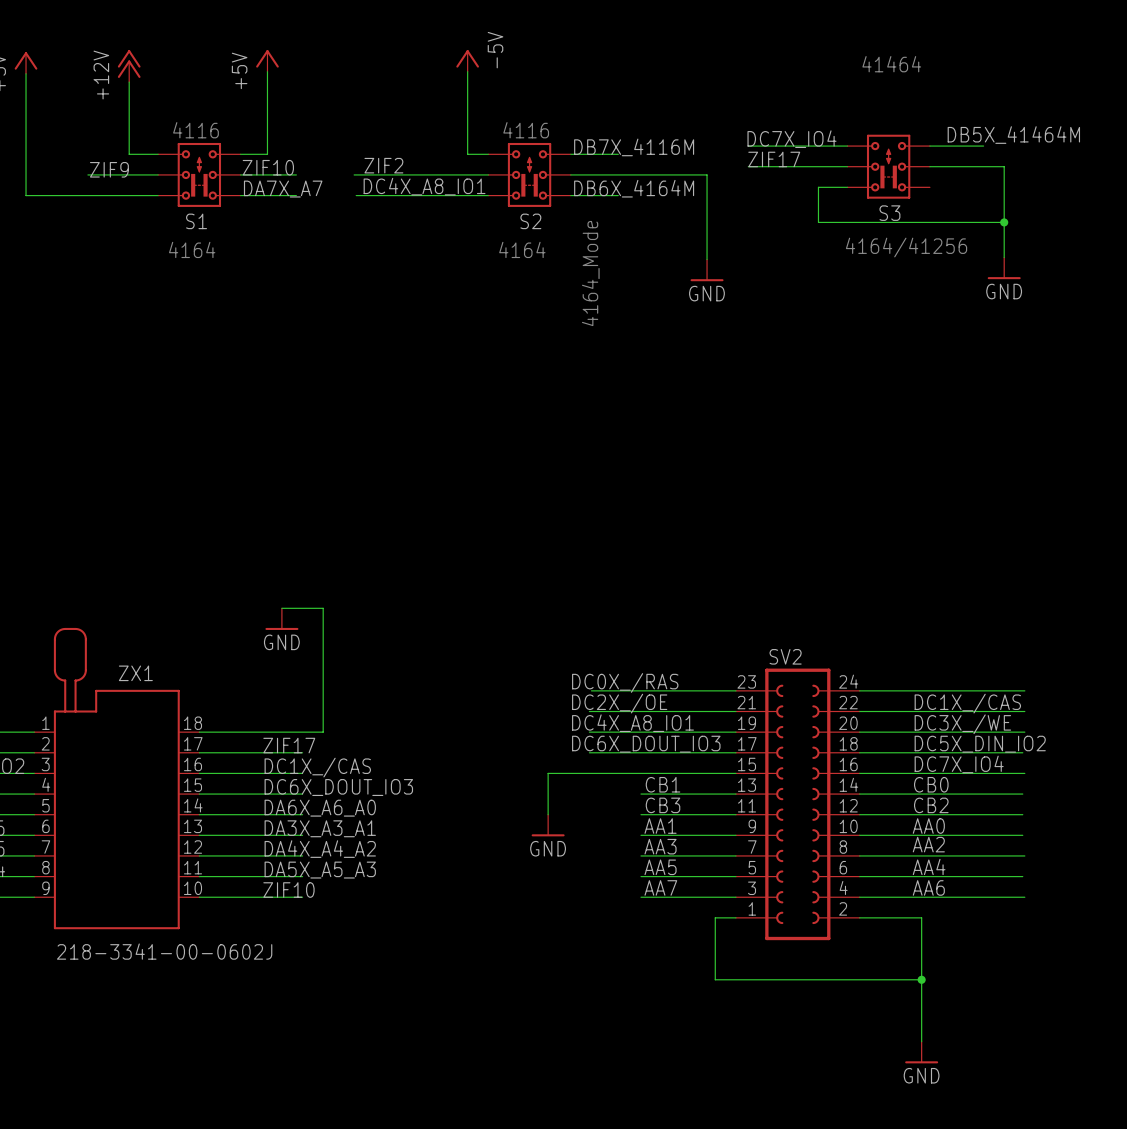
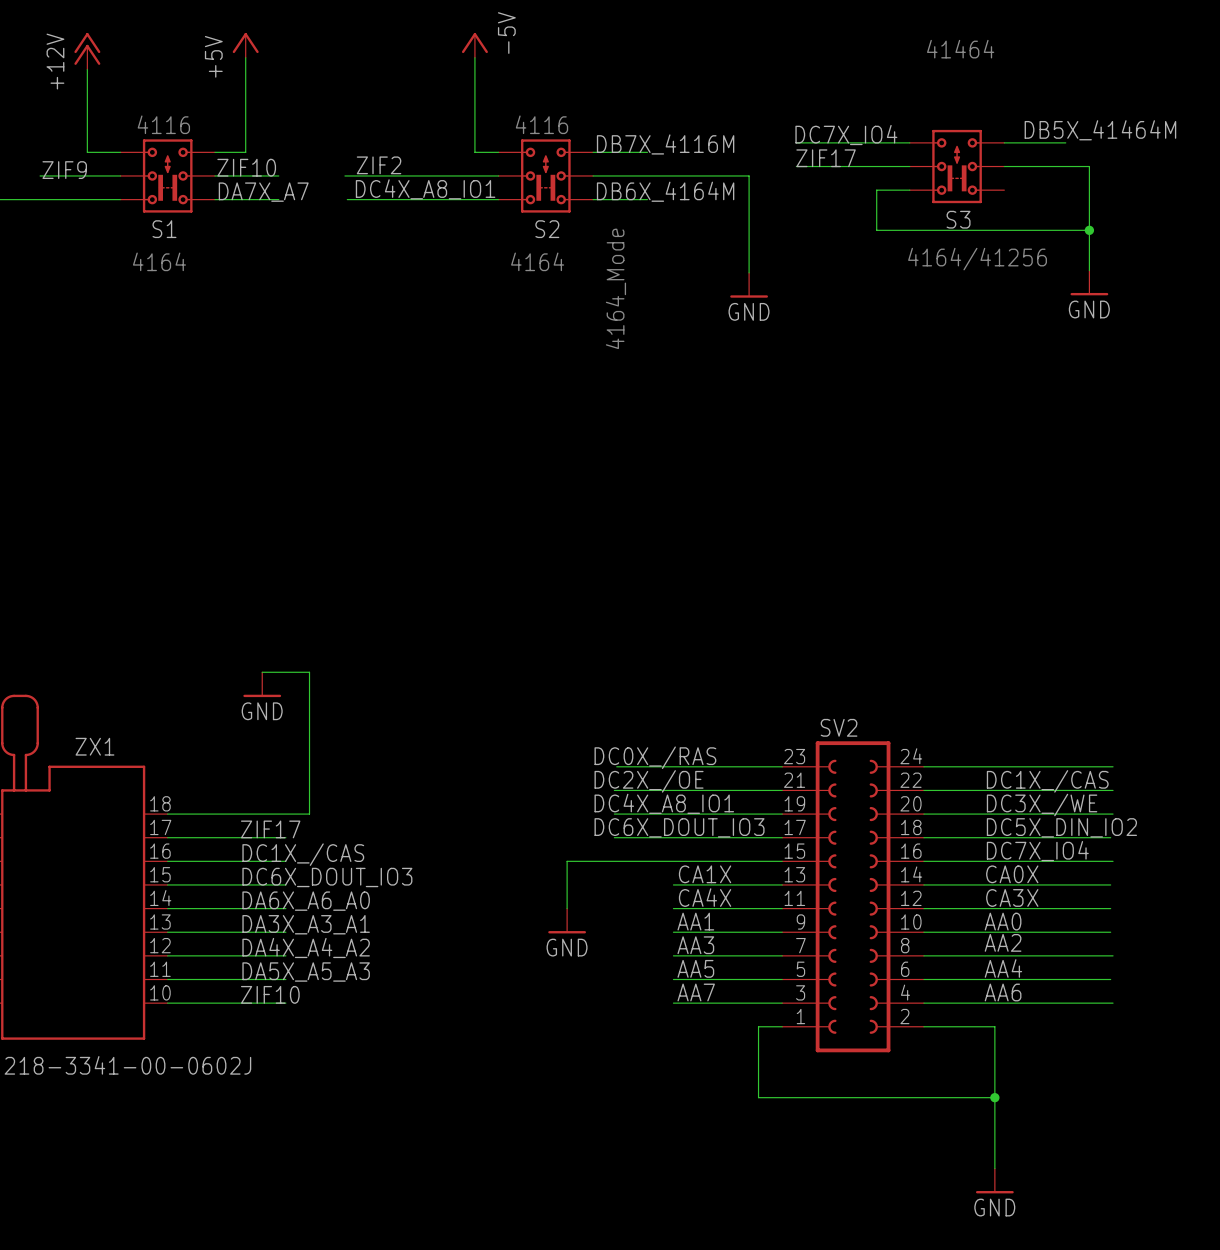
label: CB1 (663, 784) -> CA1X (705, 874)
label: CB0 (931, 784) -> CA0X (1012, 874)
label: CB3 (663, 805) -> CA4X (705, 897)
label: CB2 (931, 805) -> CA3X (1012, 897)

